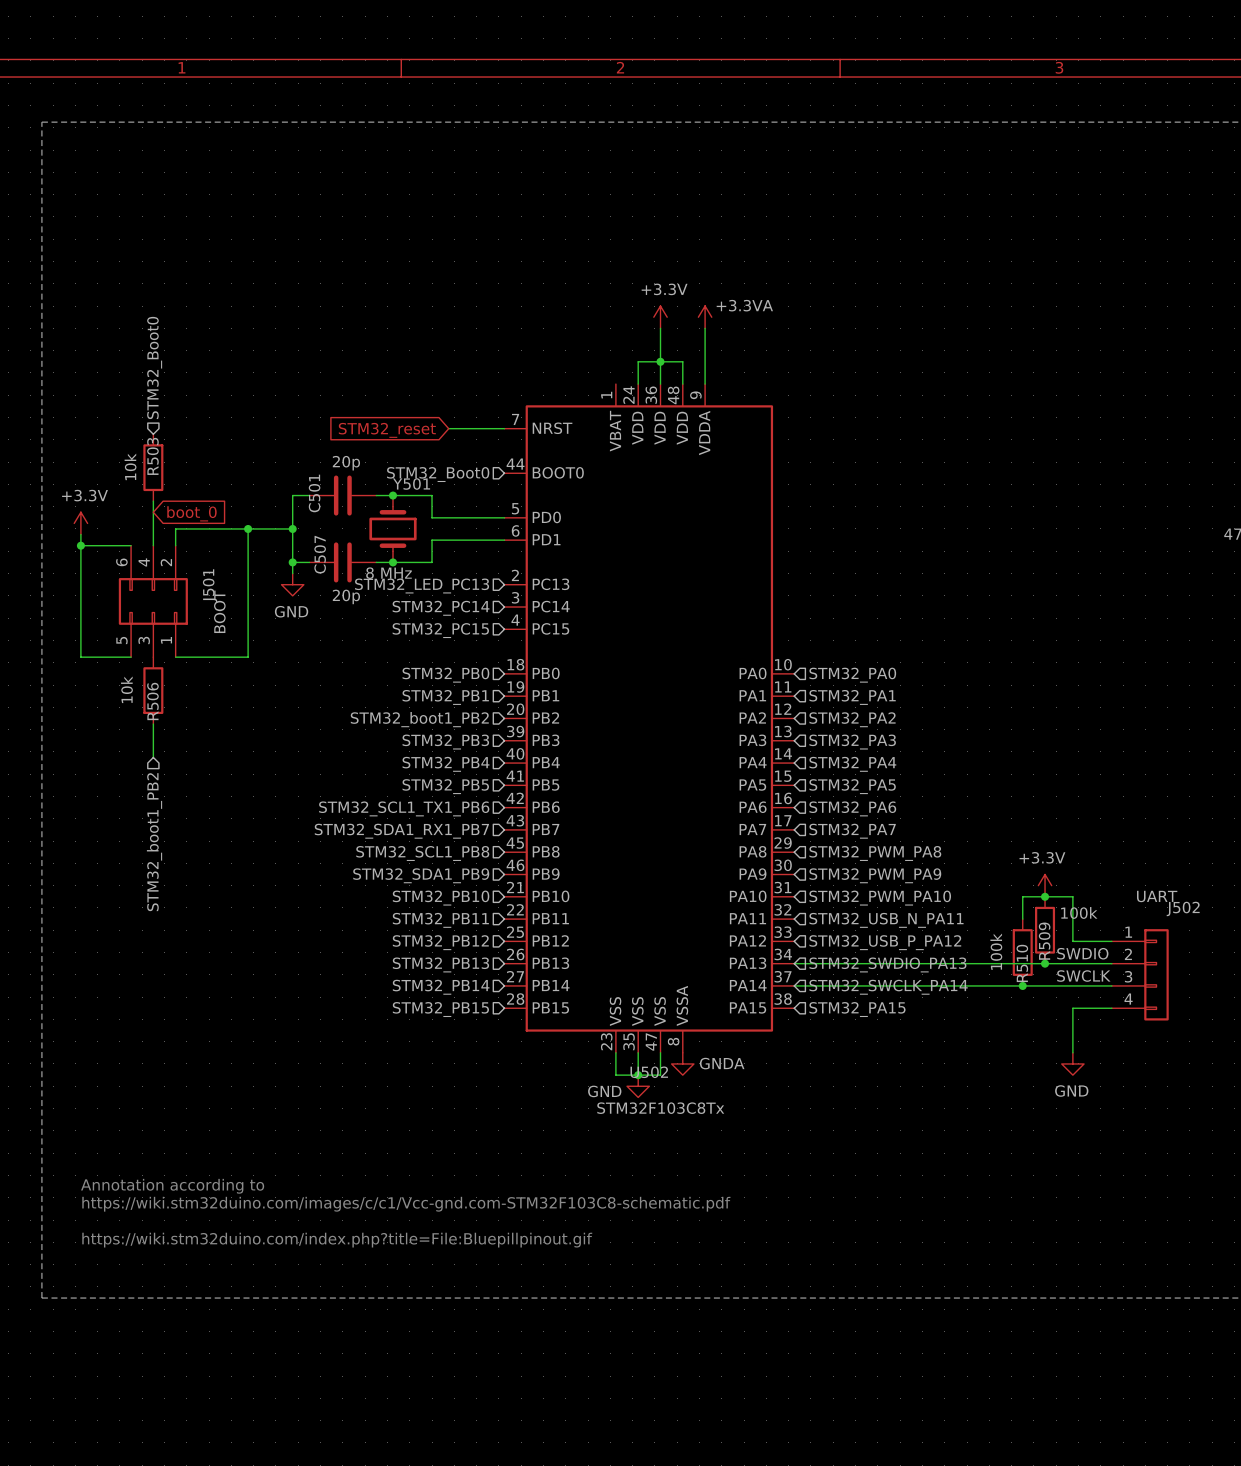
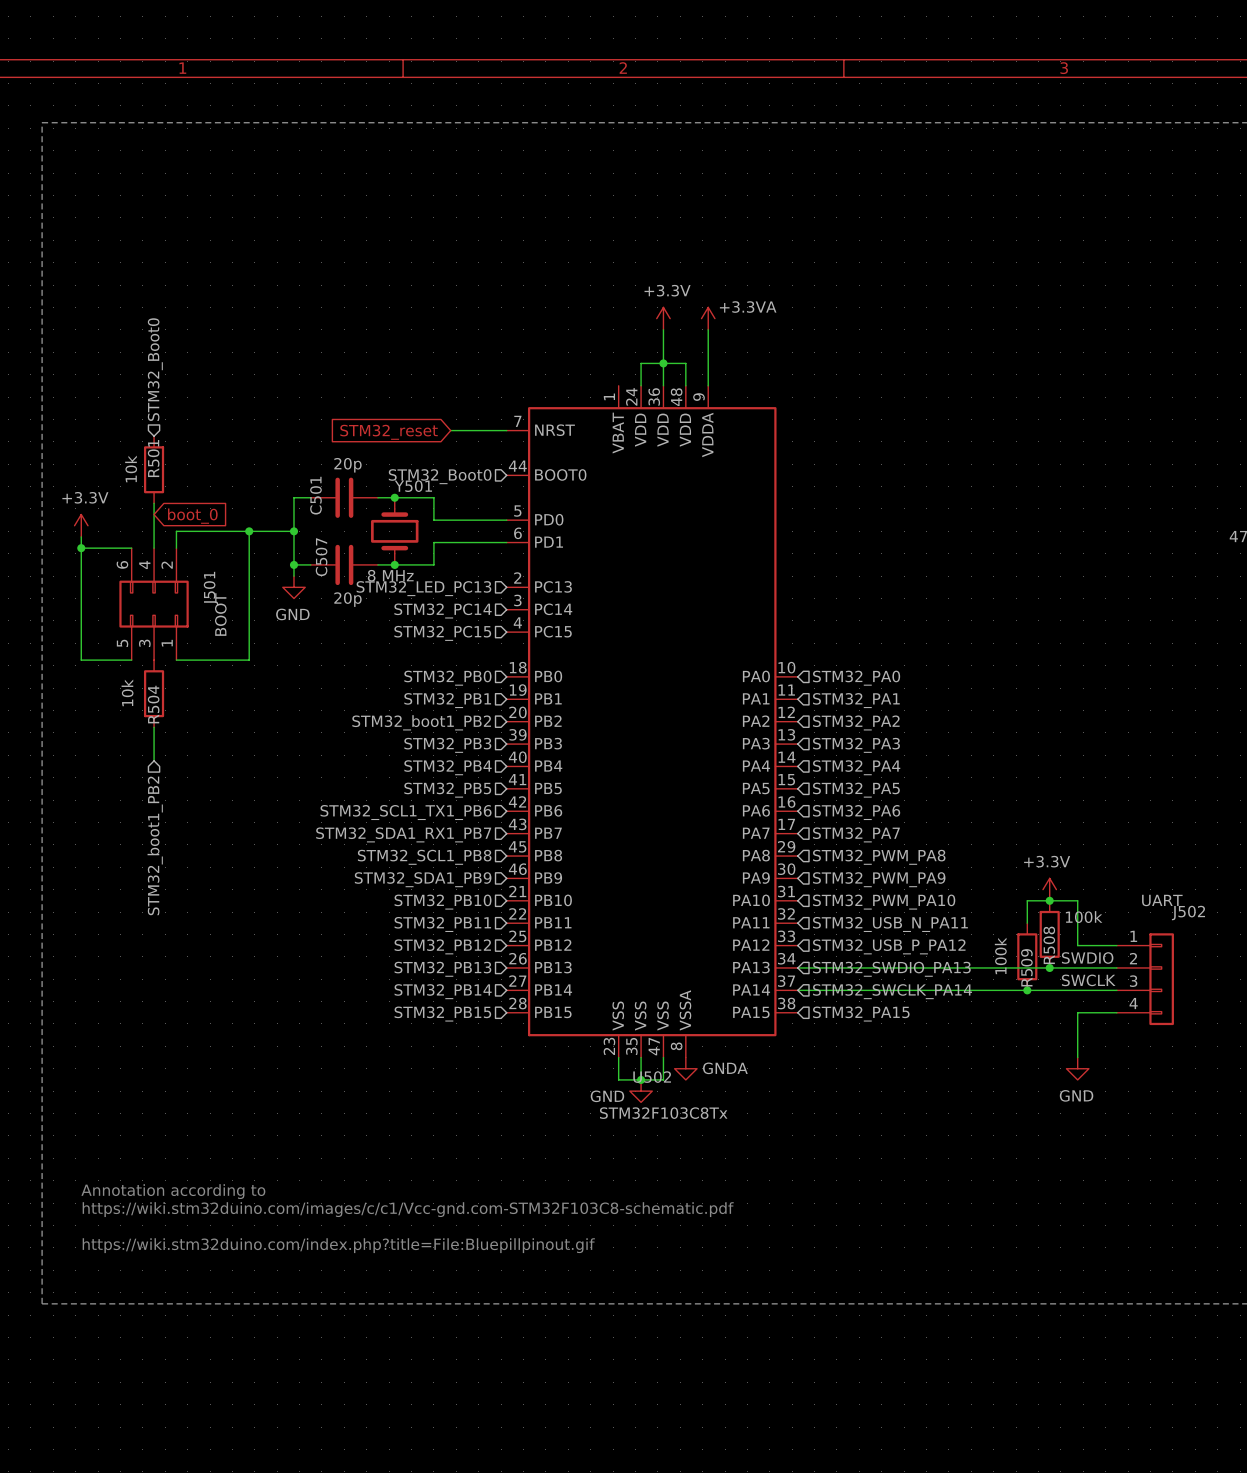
R503 name: R503 (152, 456) -> R501 (153, 458)
R506 name: R506 (152, 701) -> R504 (153, 704)
R509 name: R509 (1044, 941) -> R508 (1049, 945)
R510 name: R510 (1022, 963) -> R509 (1026, 967)

